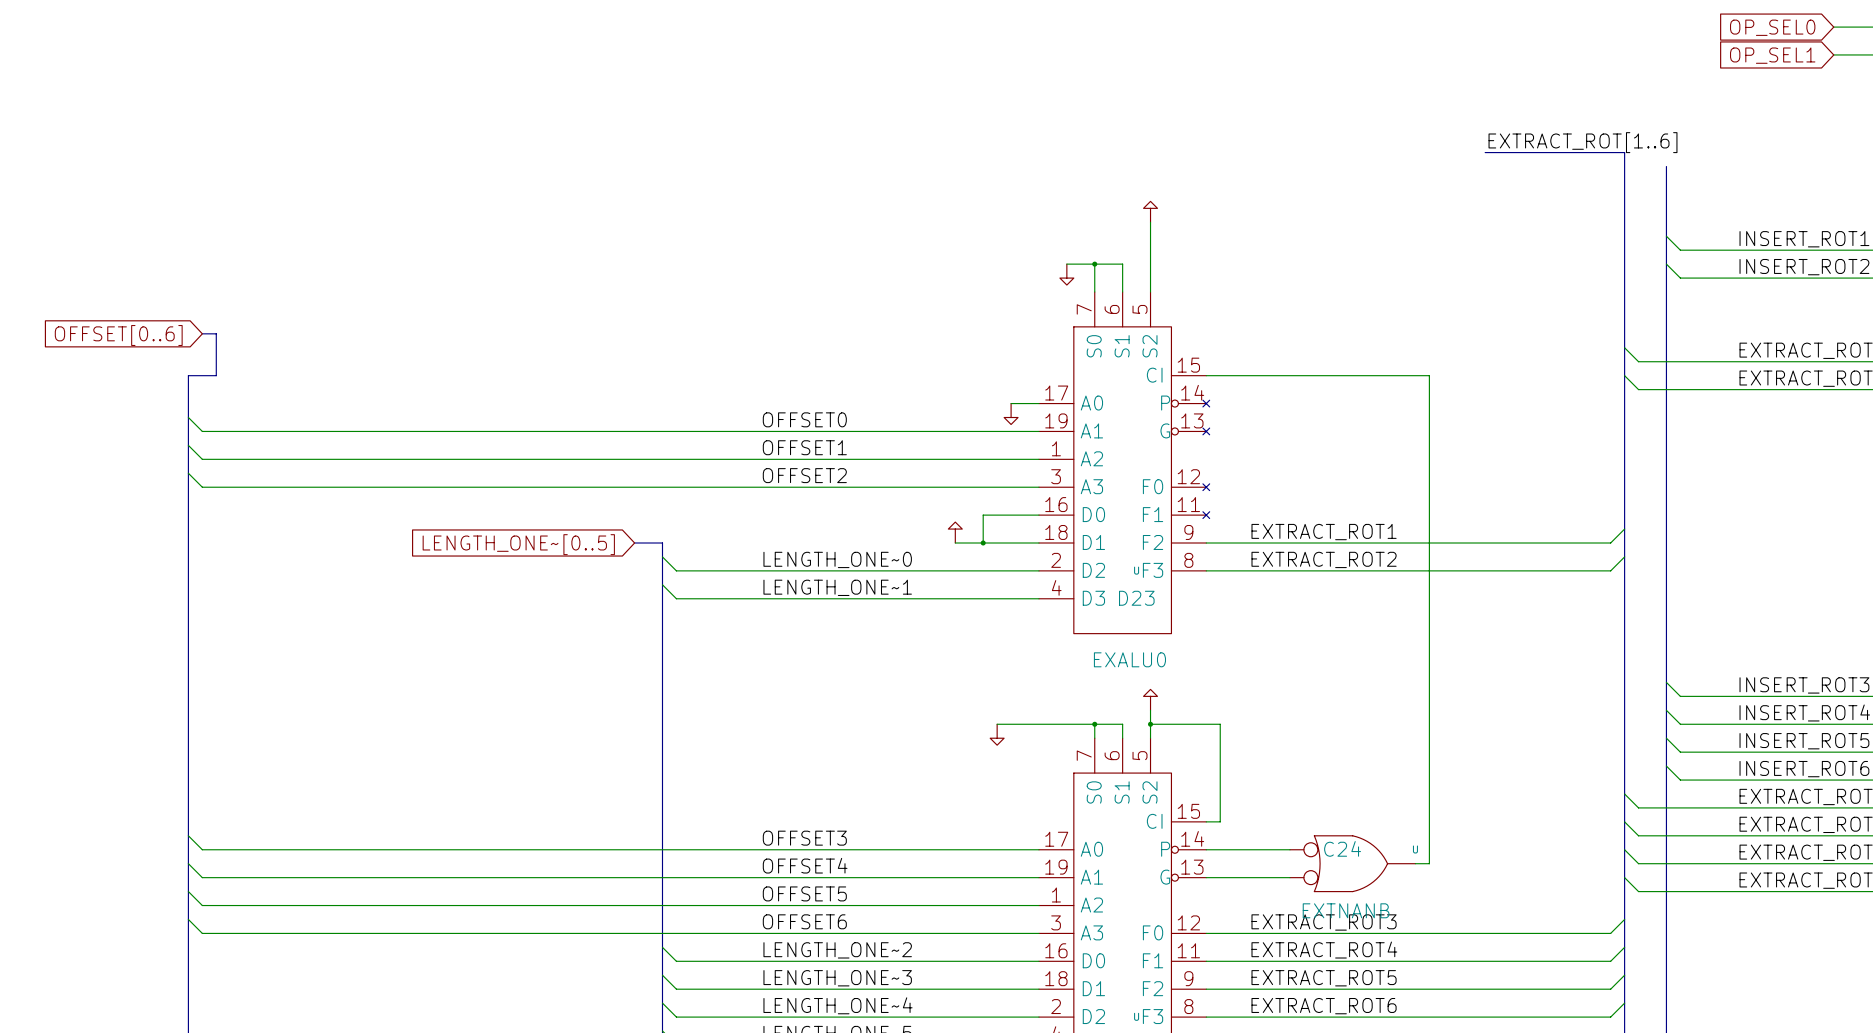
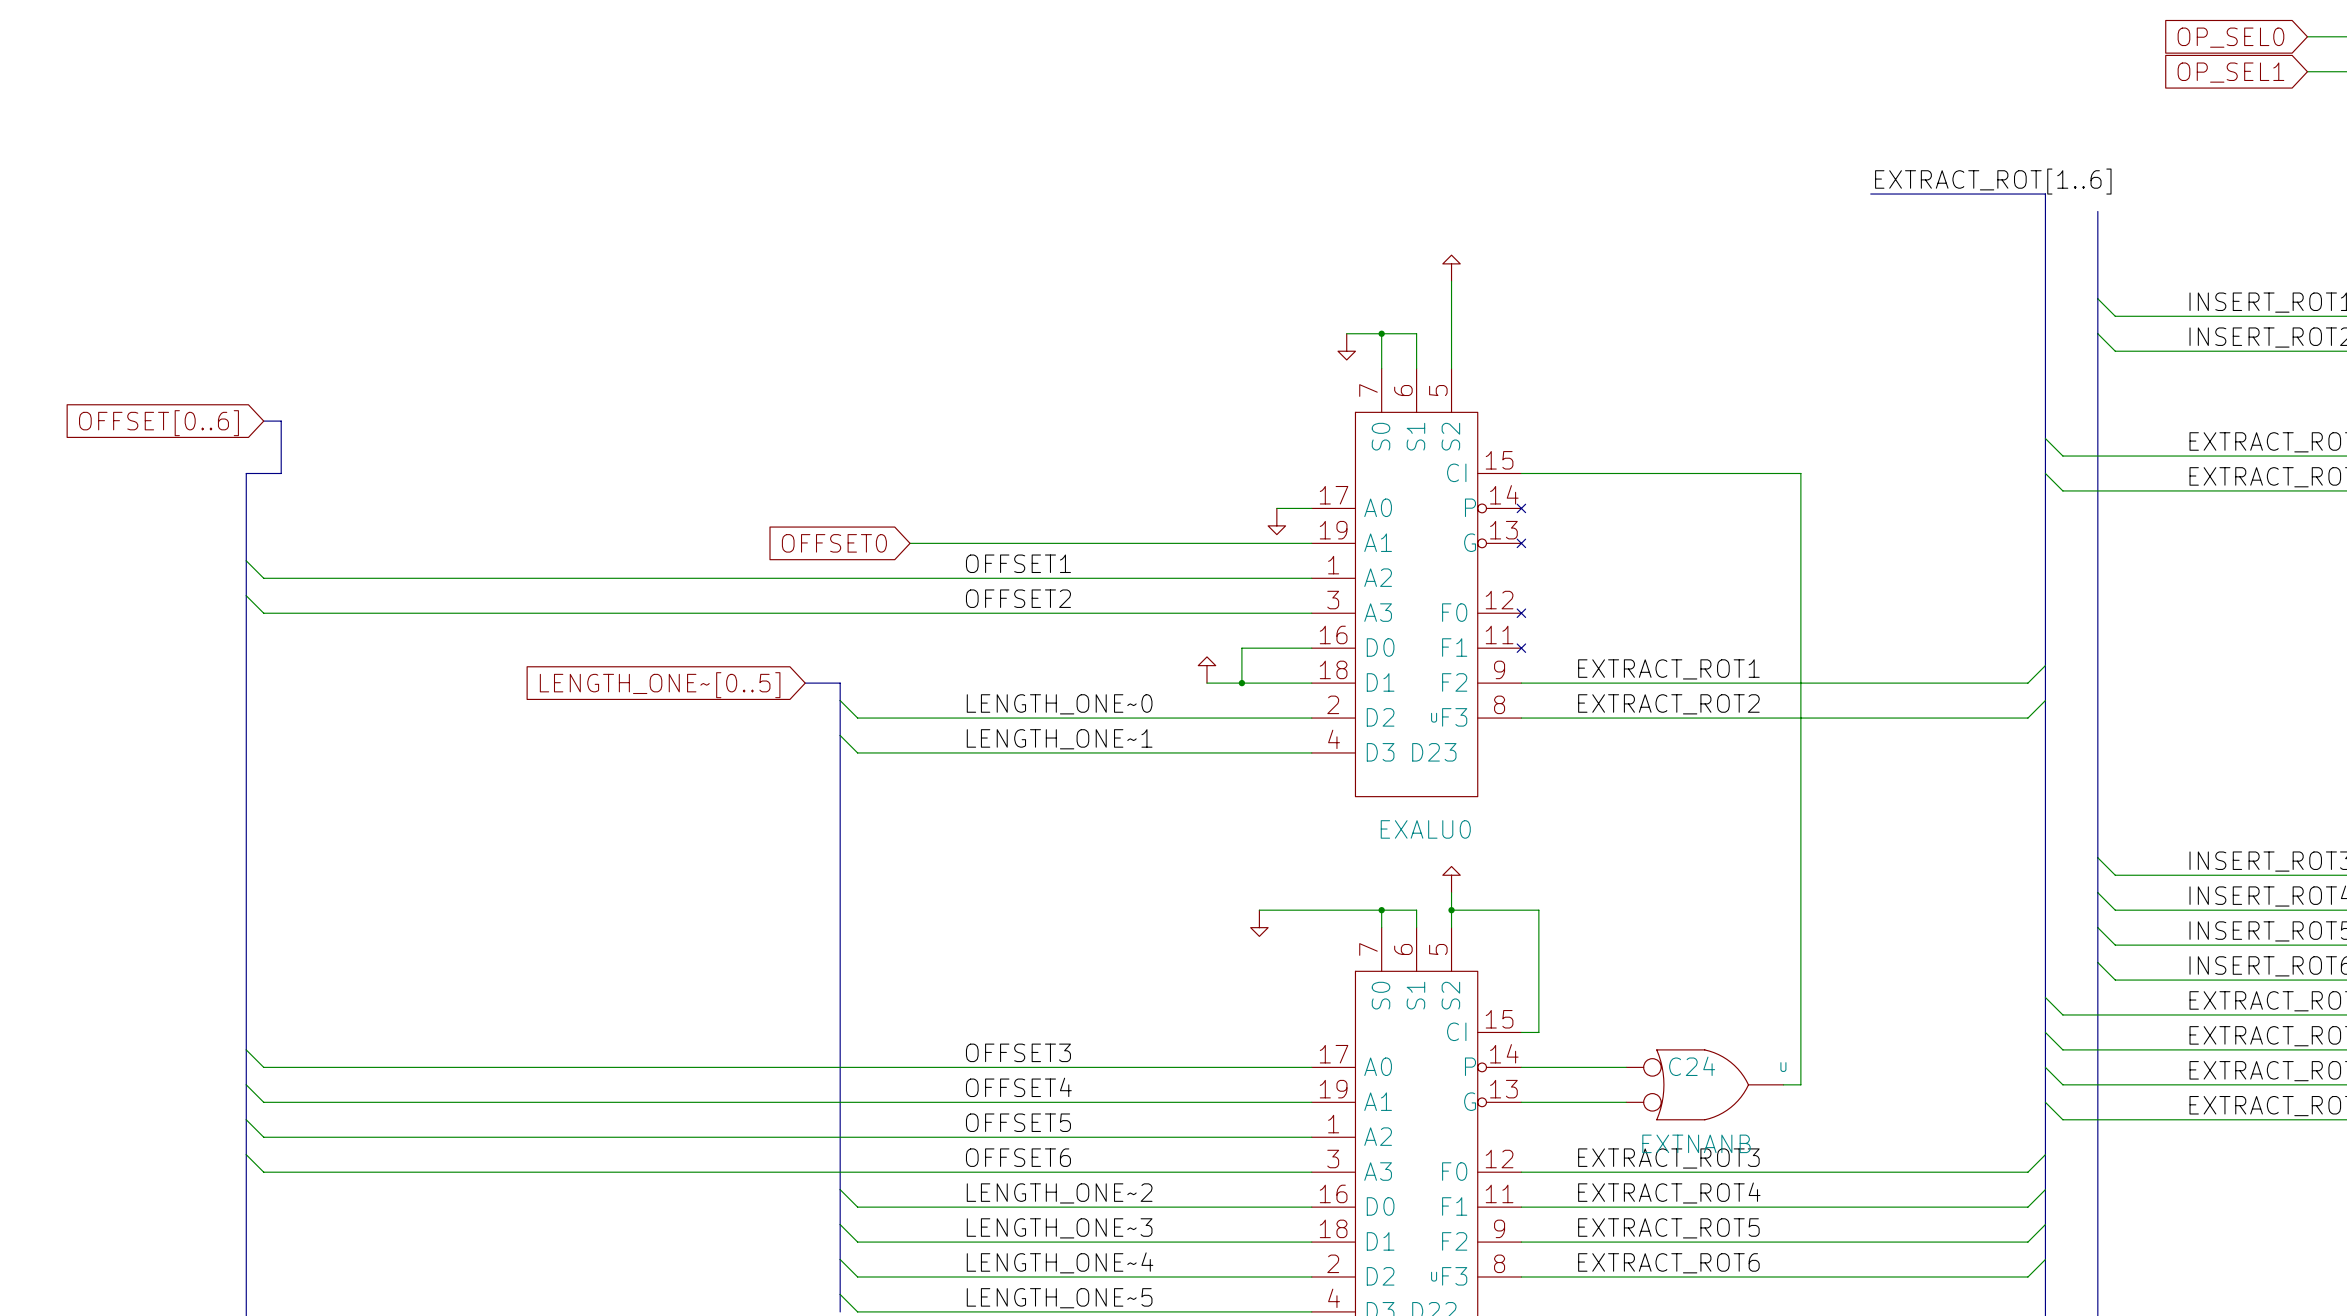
wire: (188, 417) (202, 431) (718, 431) -> none
label: OFFSET0 (804, 419) -> none
global label: none -> OFFSET0 (834, 543)

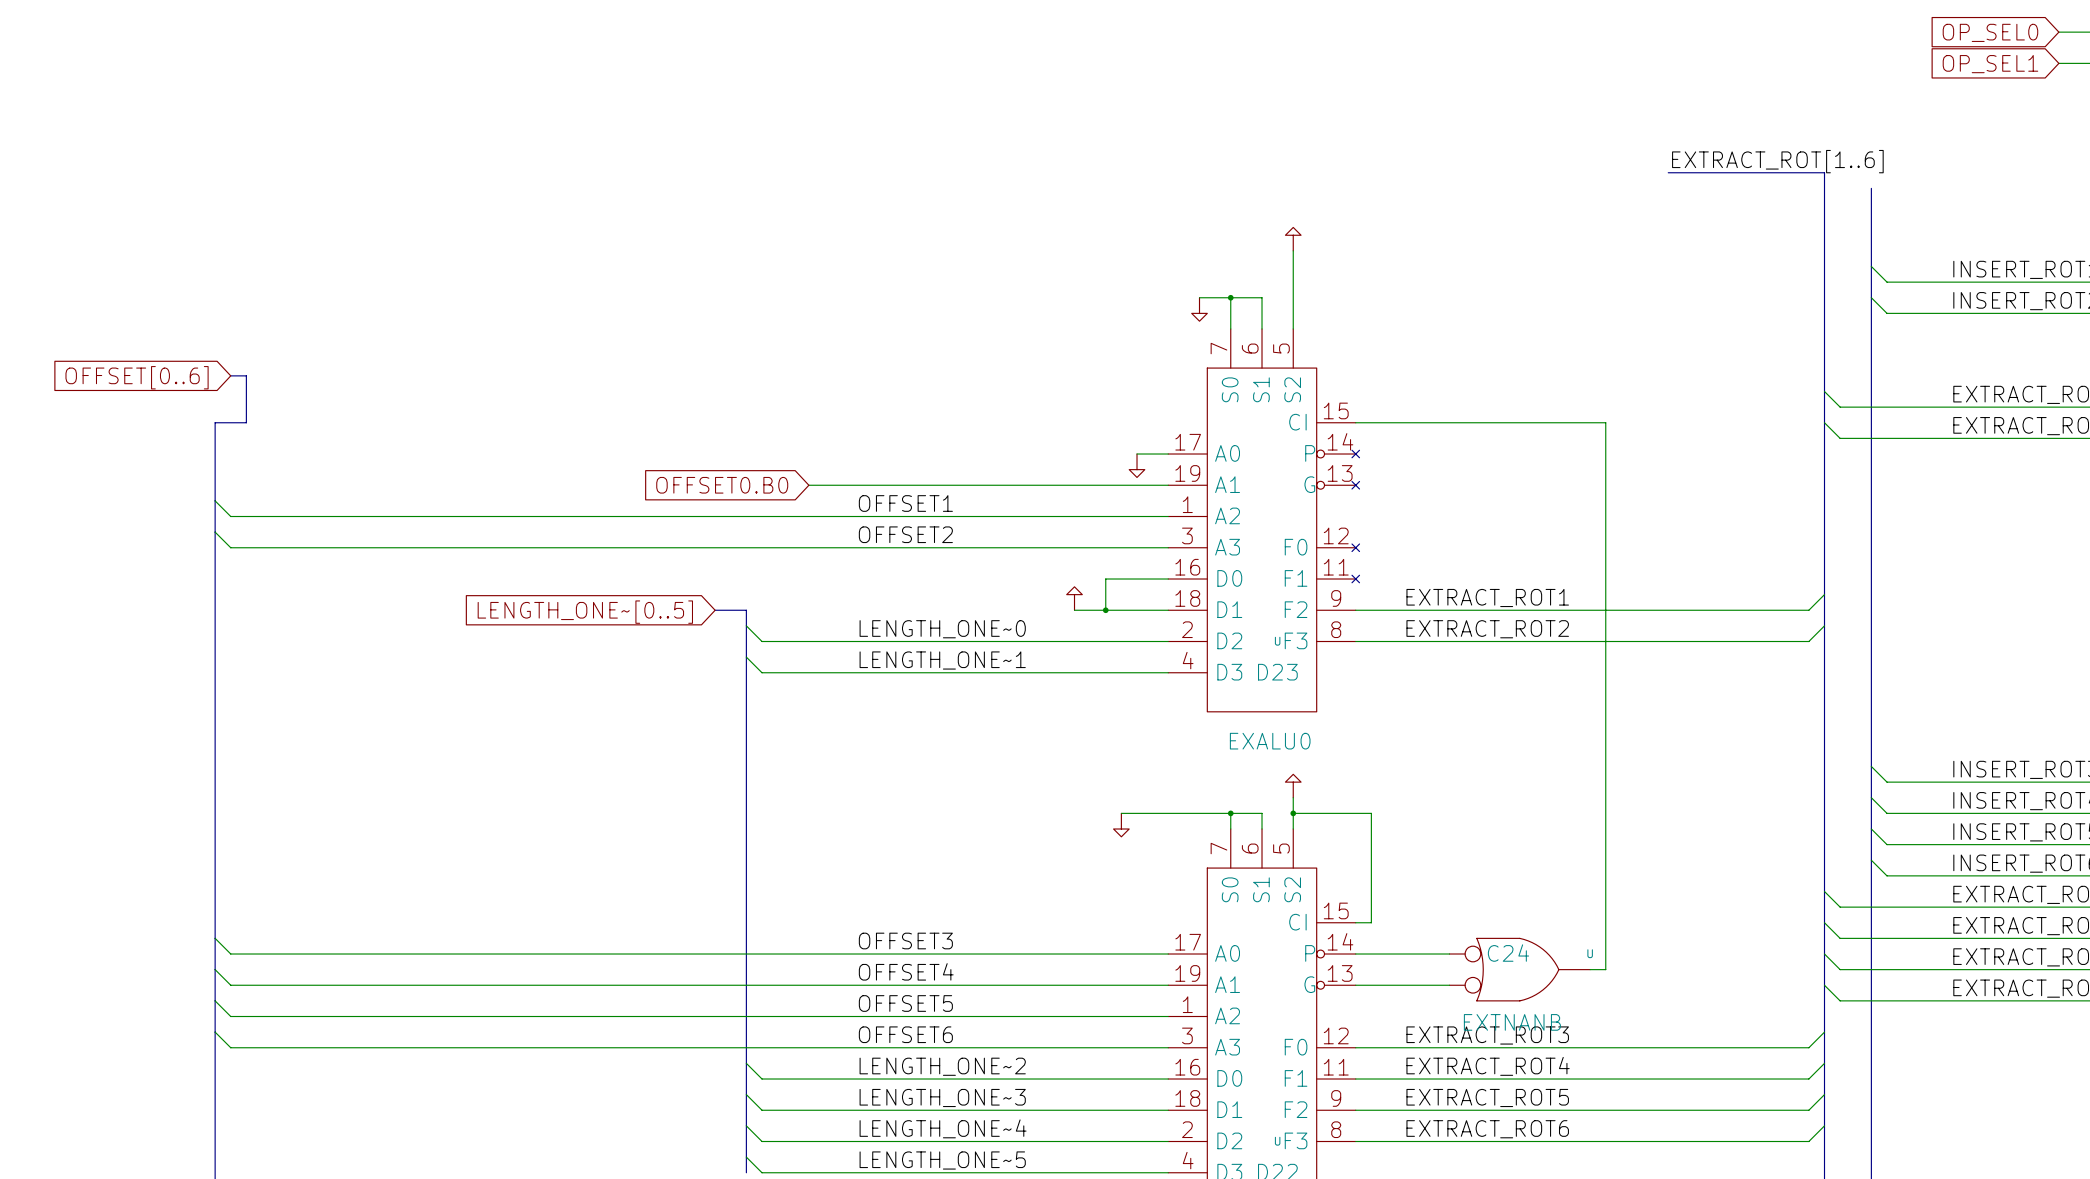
global label: OFFSET0 (834, 543) -> OFFSET0.B0 (722, 485)

